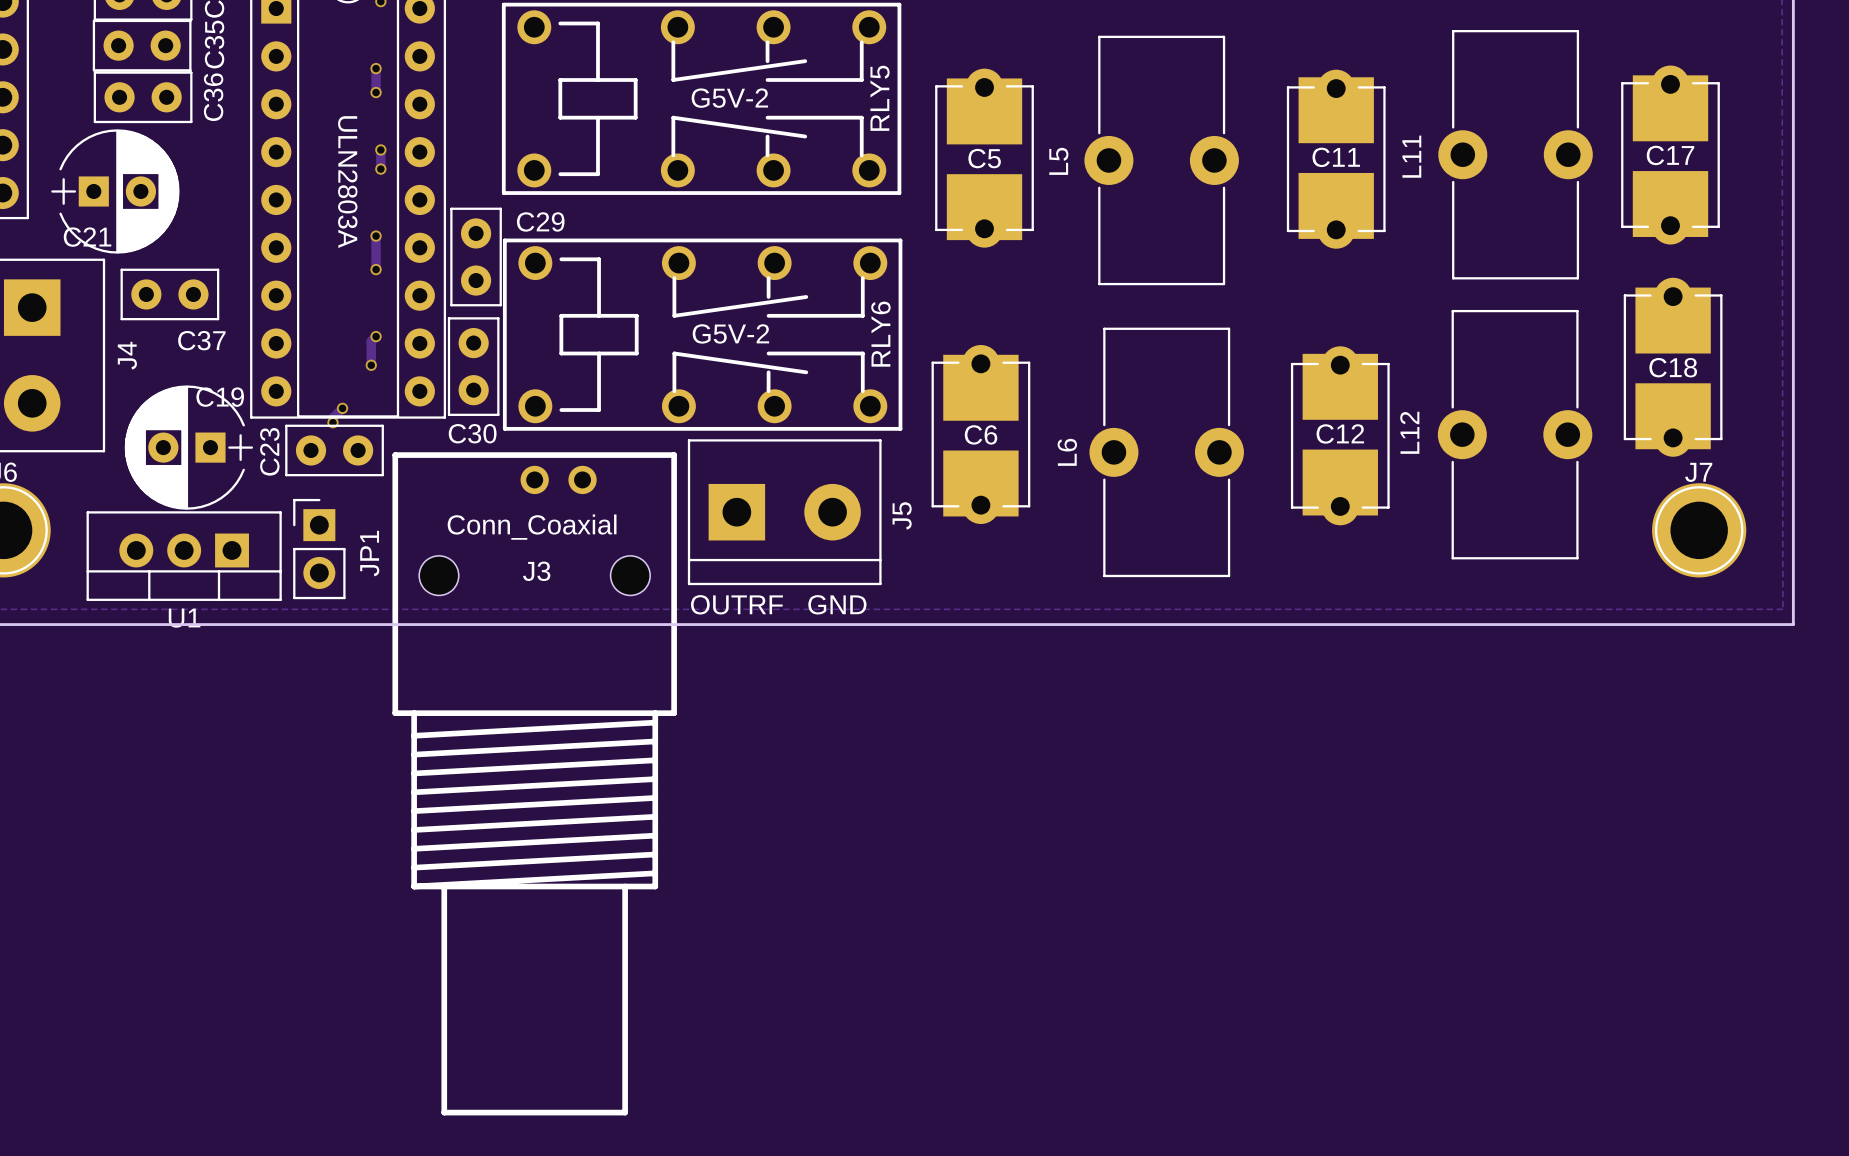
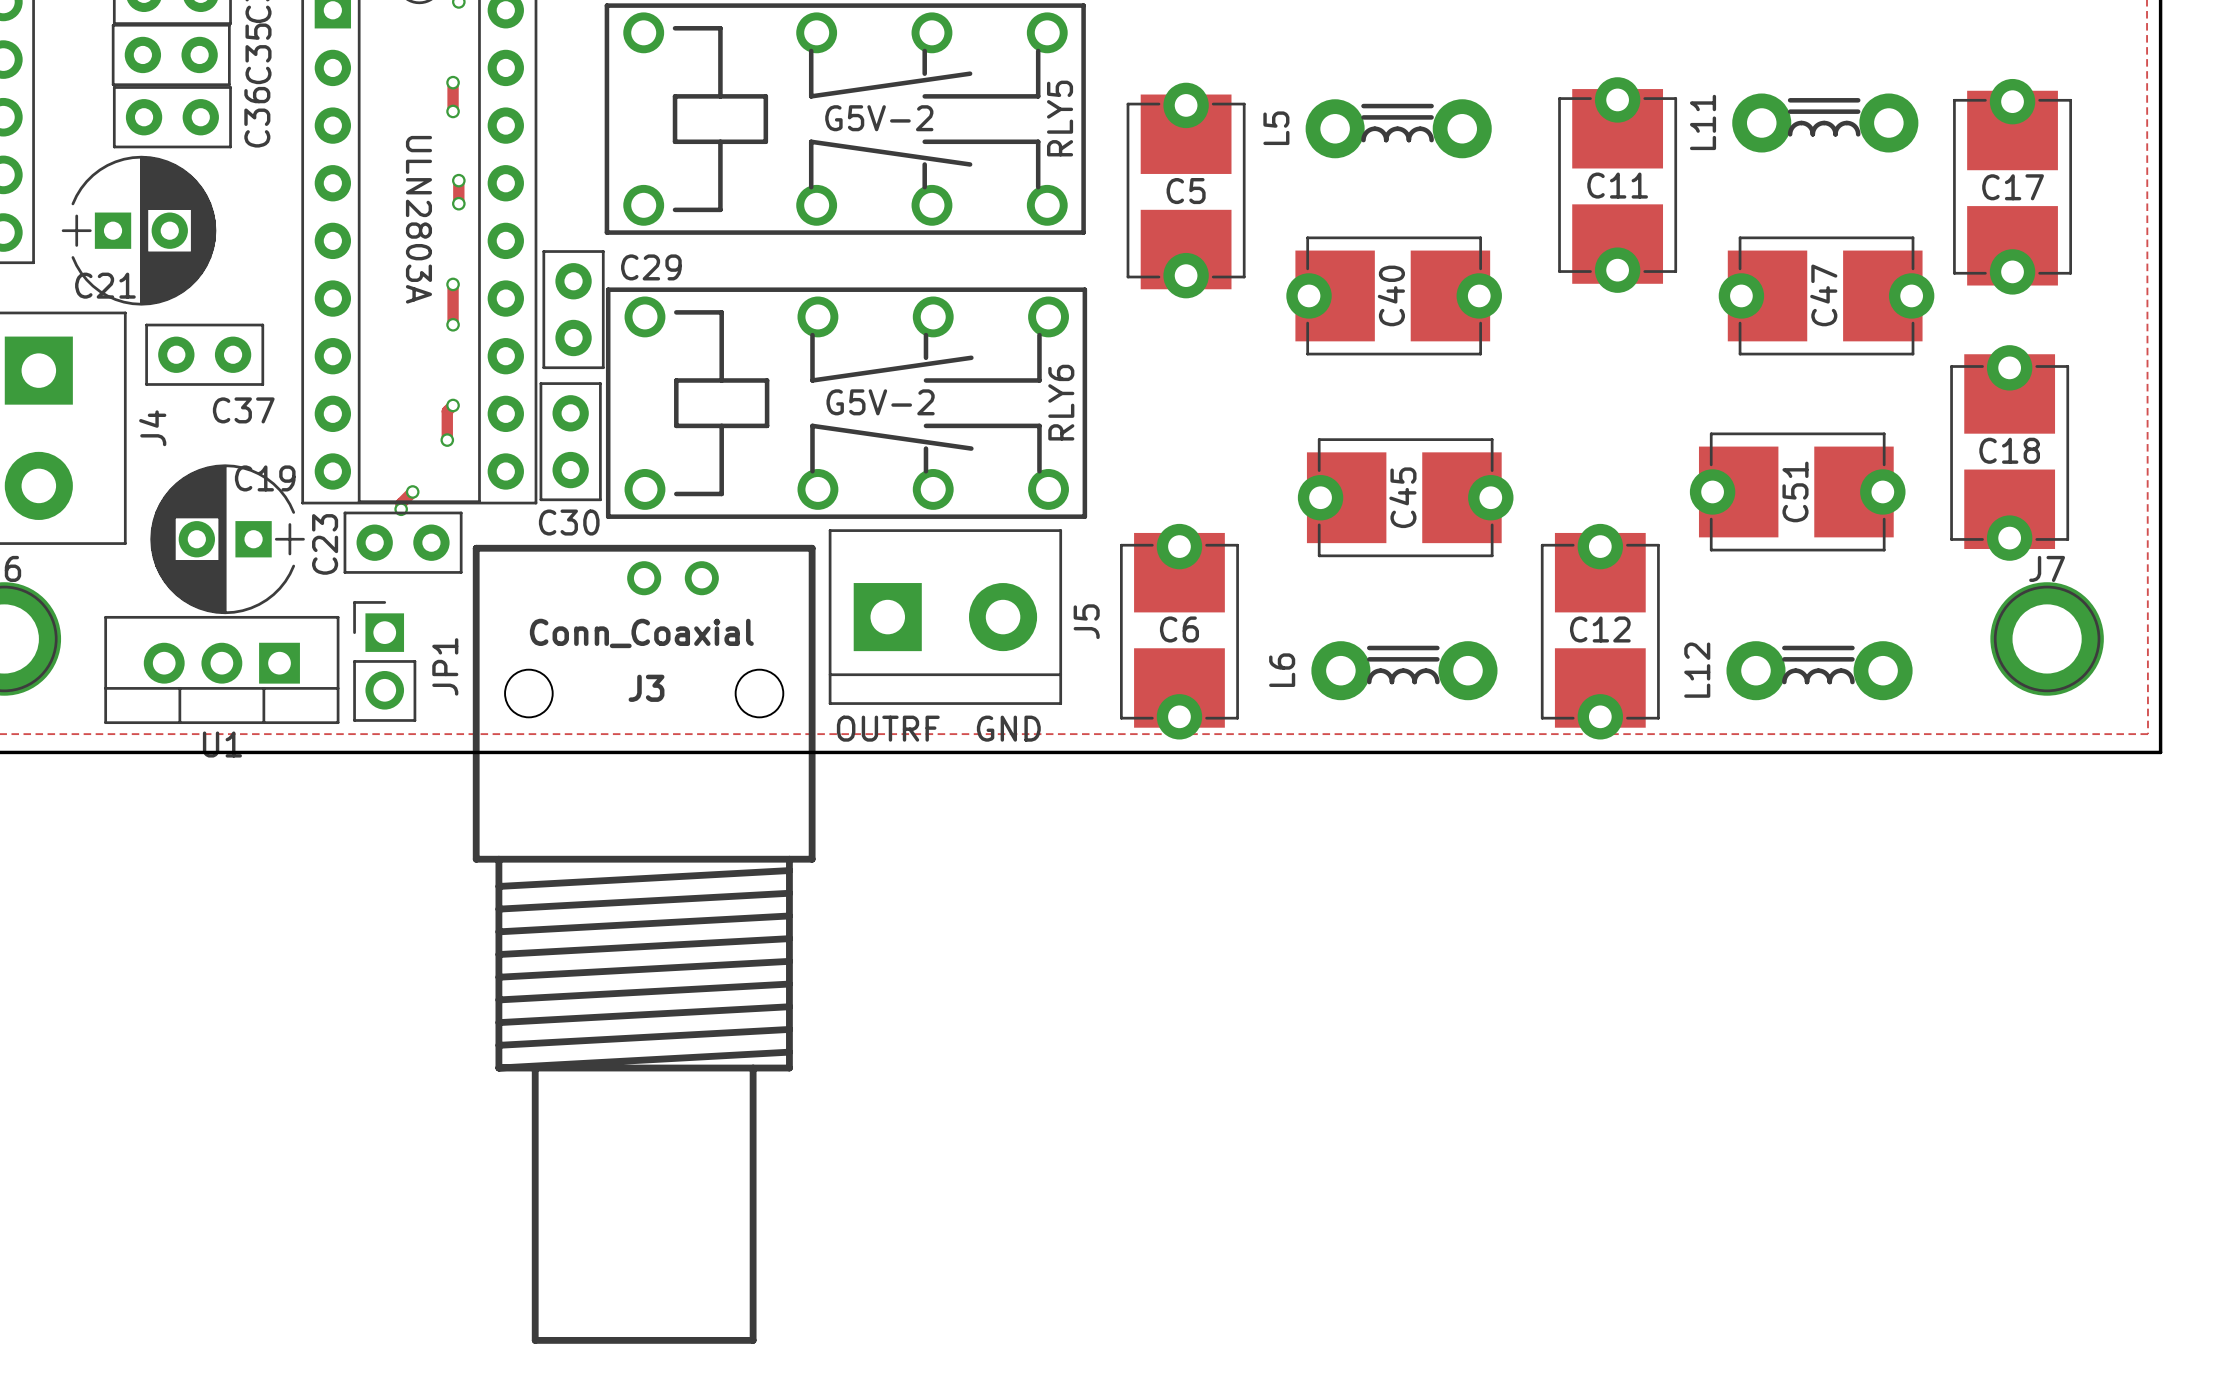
L11 footprint: [1438, 30, 1593, 280] -> [1732, 93, 1919, 153]
L5 footprint: [1084, 35, 1239, 286] -> [1305, 99, 1492, 159]
C11 rotation: 0° (1336, 159) -> 180° (1617, 185)
C40: none -> (1394, 295)
C47: none -> (1826, 295)
L12 footprint: [1437, 309, 1593, 560] -> [1726, 641, 1913, 701]
L6 footprint: [1089, 327, 1244, 578] -> [1311, 641, 1498, 701]
C18 rotation: 0° (1673, 367) -> 180° (2009, 452)
C51: none -> (1797, 491)
C45: none -> (1405, 497)
C6 rotation: 0° (980, 434) -> 180° (1179, 631)
C12 position: (1340, 435) -> (1600, 631)

